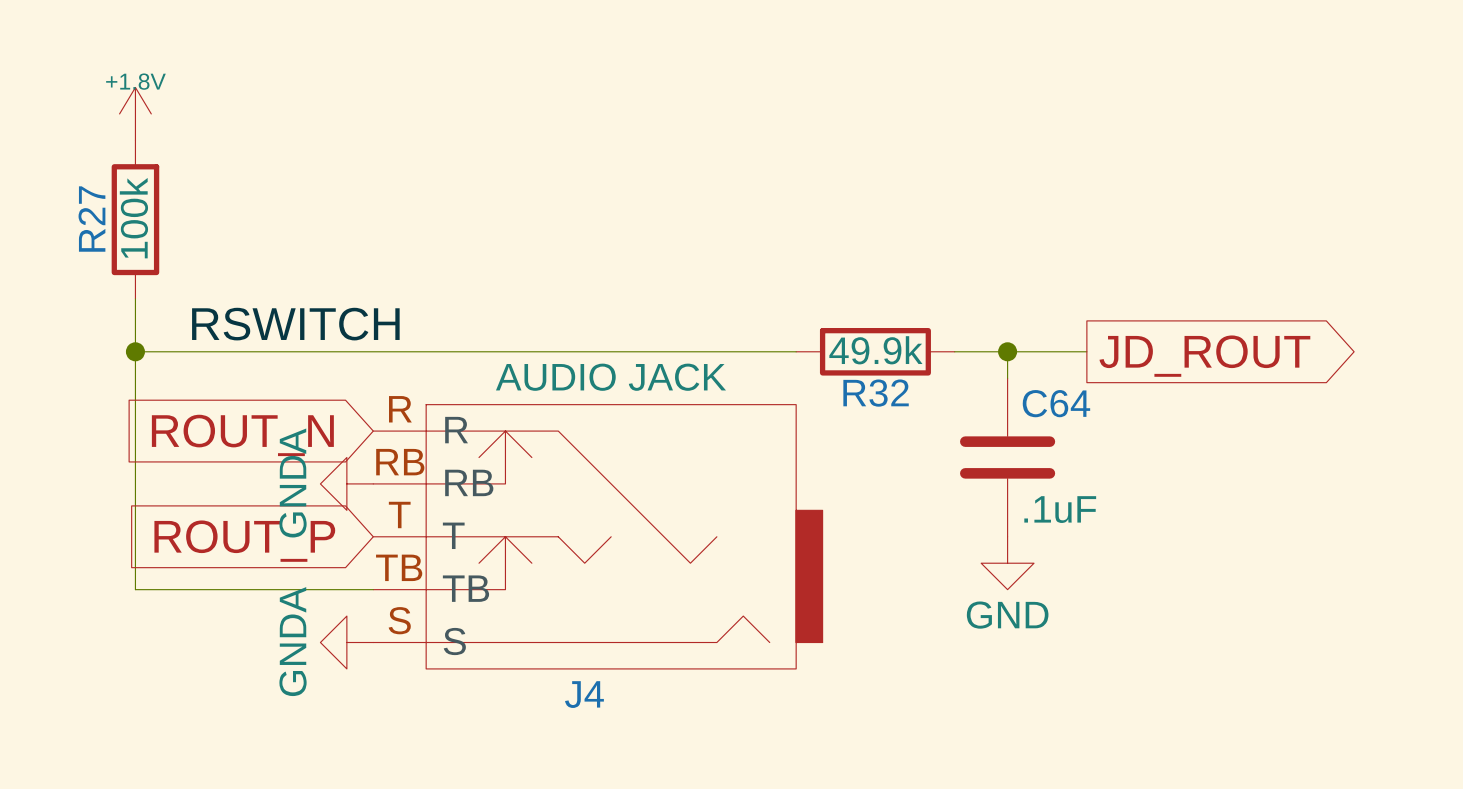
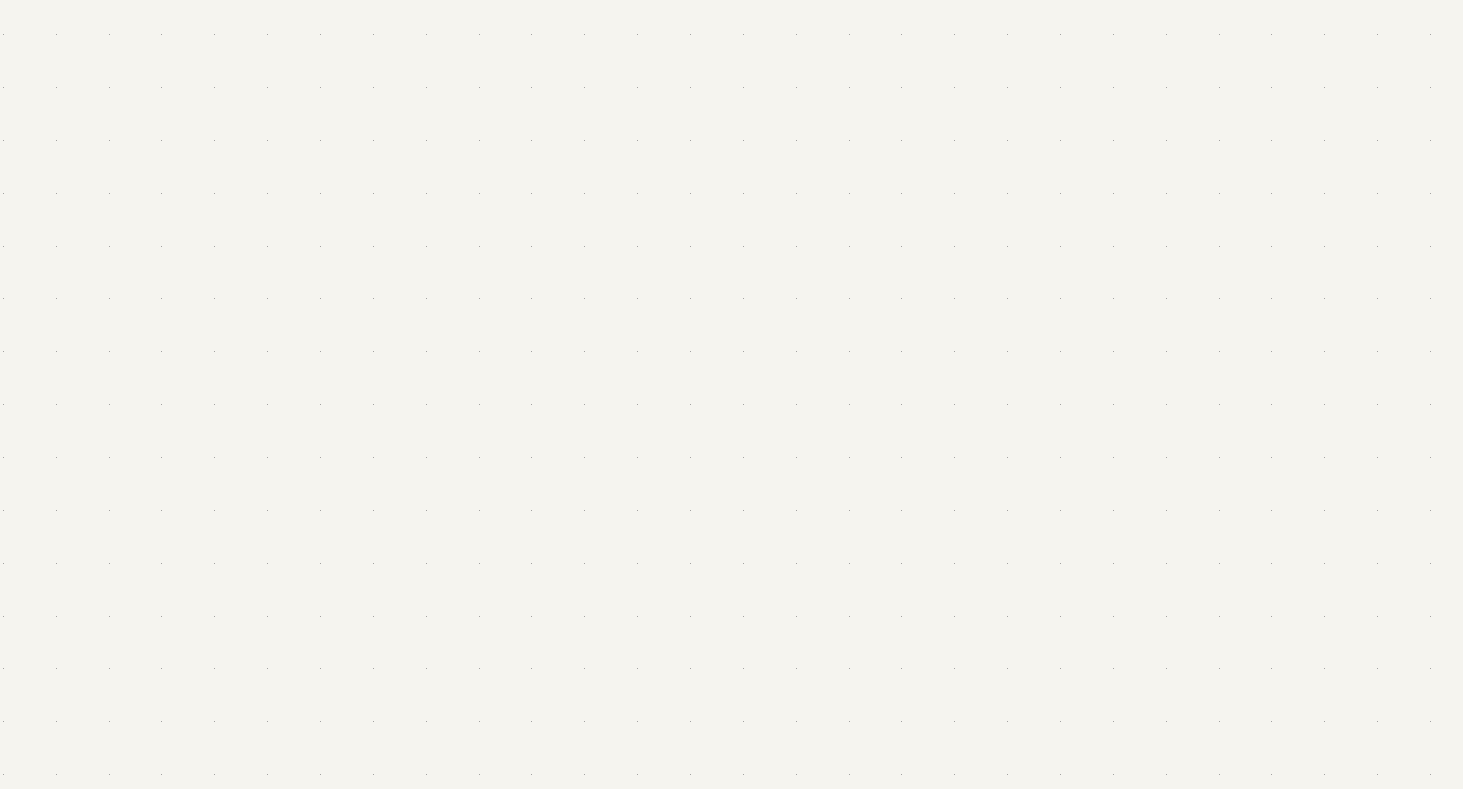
power symbol: +1.8V (135, 113) -> none
R27: 100k (135, 219) -> none
wire: (135, 298) (135, 589) (373, 589) -> none
label: RSWITCH (295, 324) -> none
wire: (135, 351) (796, 351) -> none
junction: (135, 351) -> none
R32: 49.9k (875, 351) -> none
wire: (954, 351) (1086, 351) -> none
wire: (1007, 351) (1007, 378) -> none
junction: (1007, 351) -> none
global label: JD_ROUT (1204, 356) -> none
global label: ROUT_N (242, 435) -> none
C64: .1uF (1007, 457) -> none
power symbol: GNDA (346, 483) -> none
J4: AUDIO JACK (597, 536) -> none
global label: ROUT_P (244, 541) -> none
power symbol: GND (1007, 563) -> none
power symbol: GNDA (346, 642) -> none

